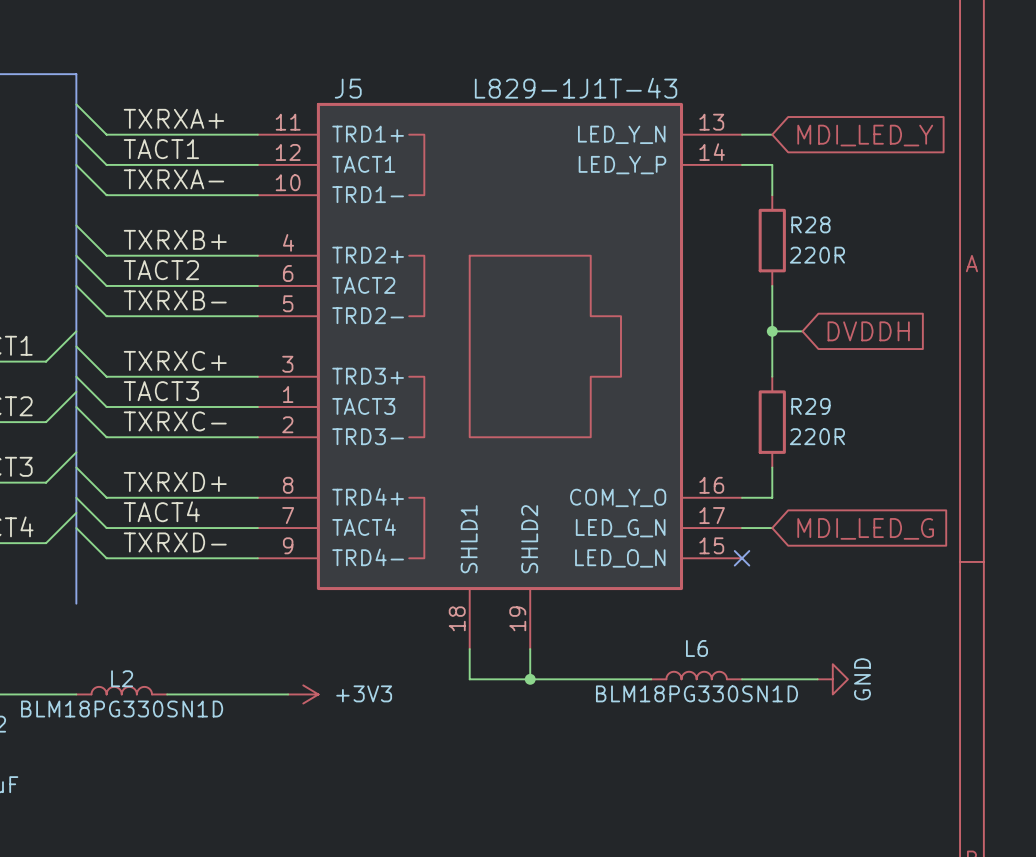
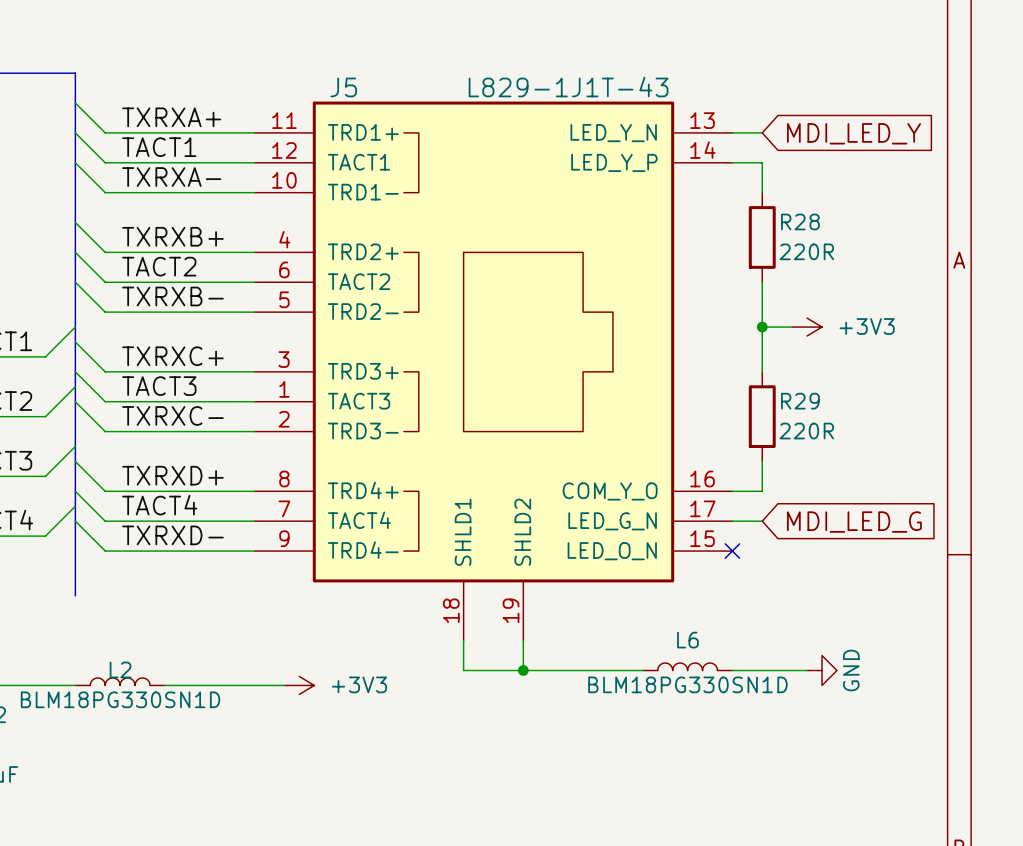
power symbol: none -> +3V3 (807, 327)
global label: DVDDH (868, 331) -> none

